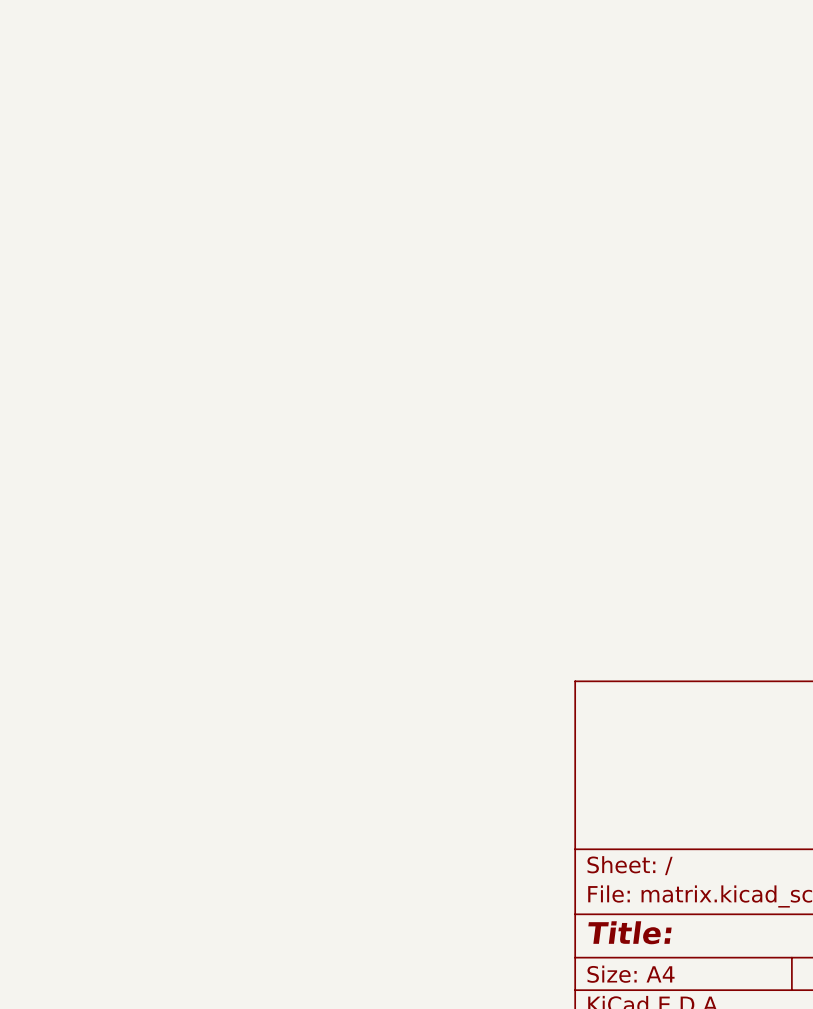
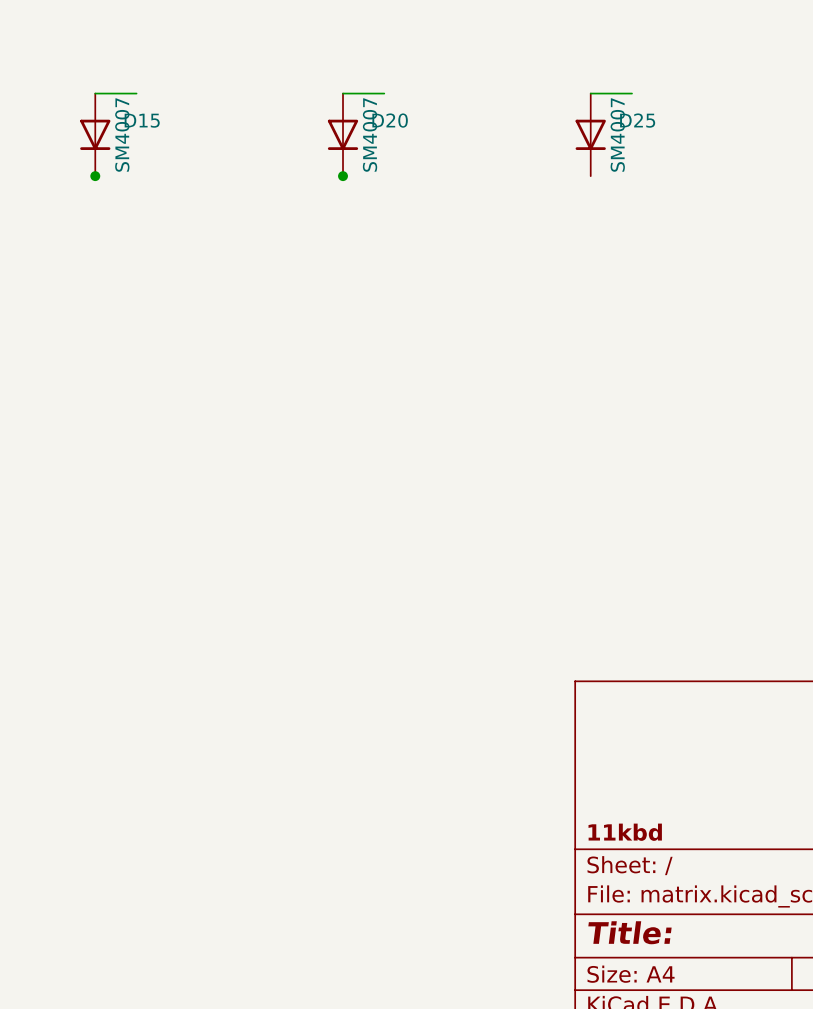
wire: none -> (95, 93) (136, 93)
wire: none -> (343, 93) (384, 93)
wire: none -> (590, 93) (632, 93)
D15: none -> SM4007 (95, 134)
D20: none -> SM4007 (343, 134)
D25: none -> SM4007 (590, 134)
junction: none -> (95, 176)
junction: none -> (343, 176)
title block: none -> 11kbd (625, 832)

